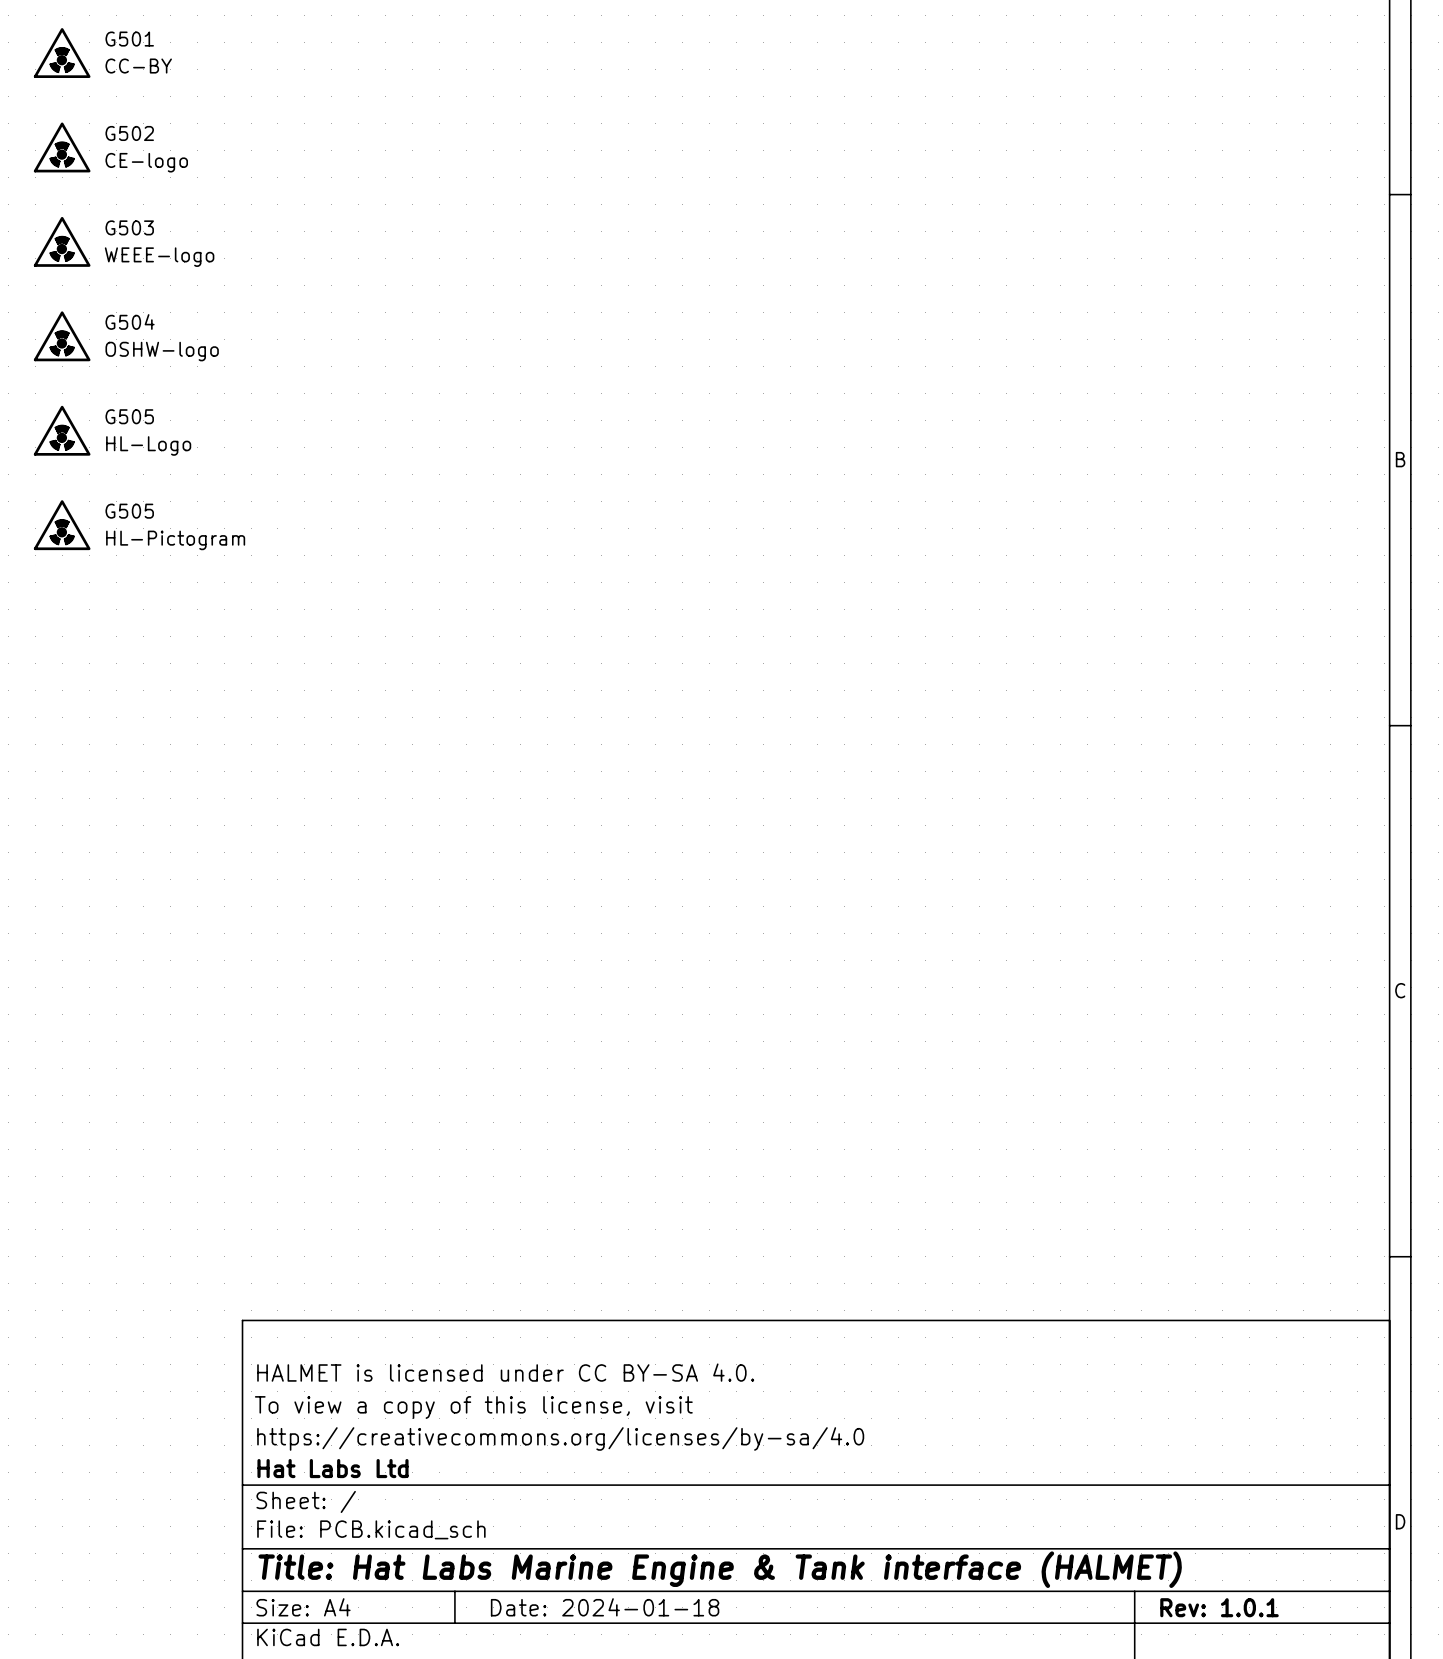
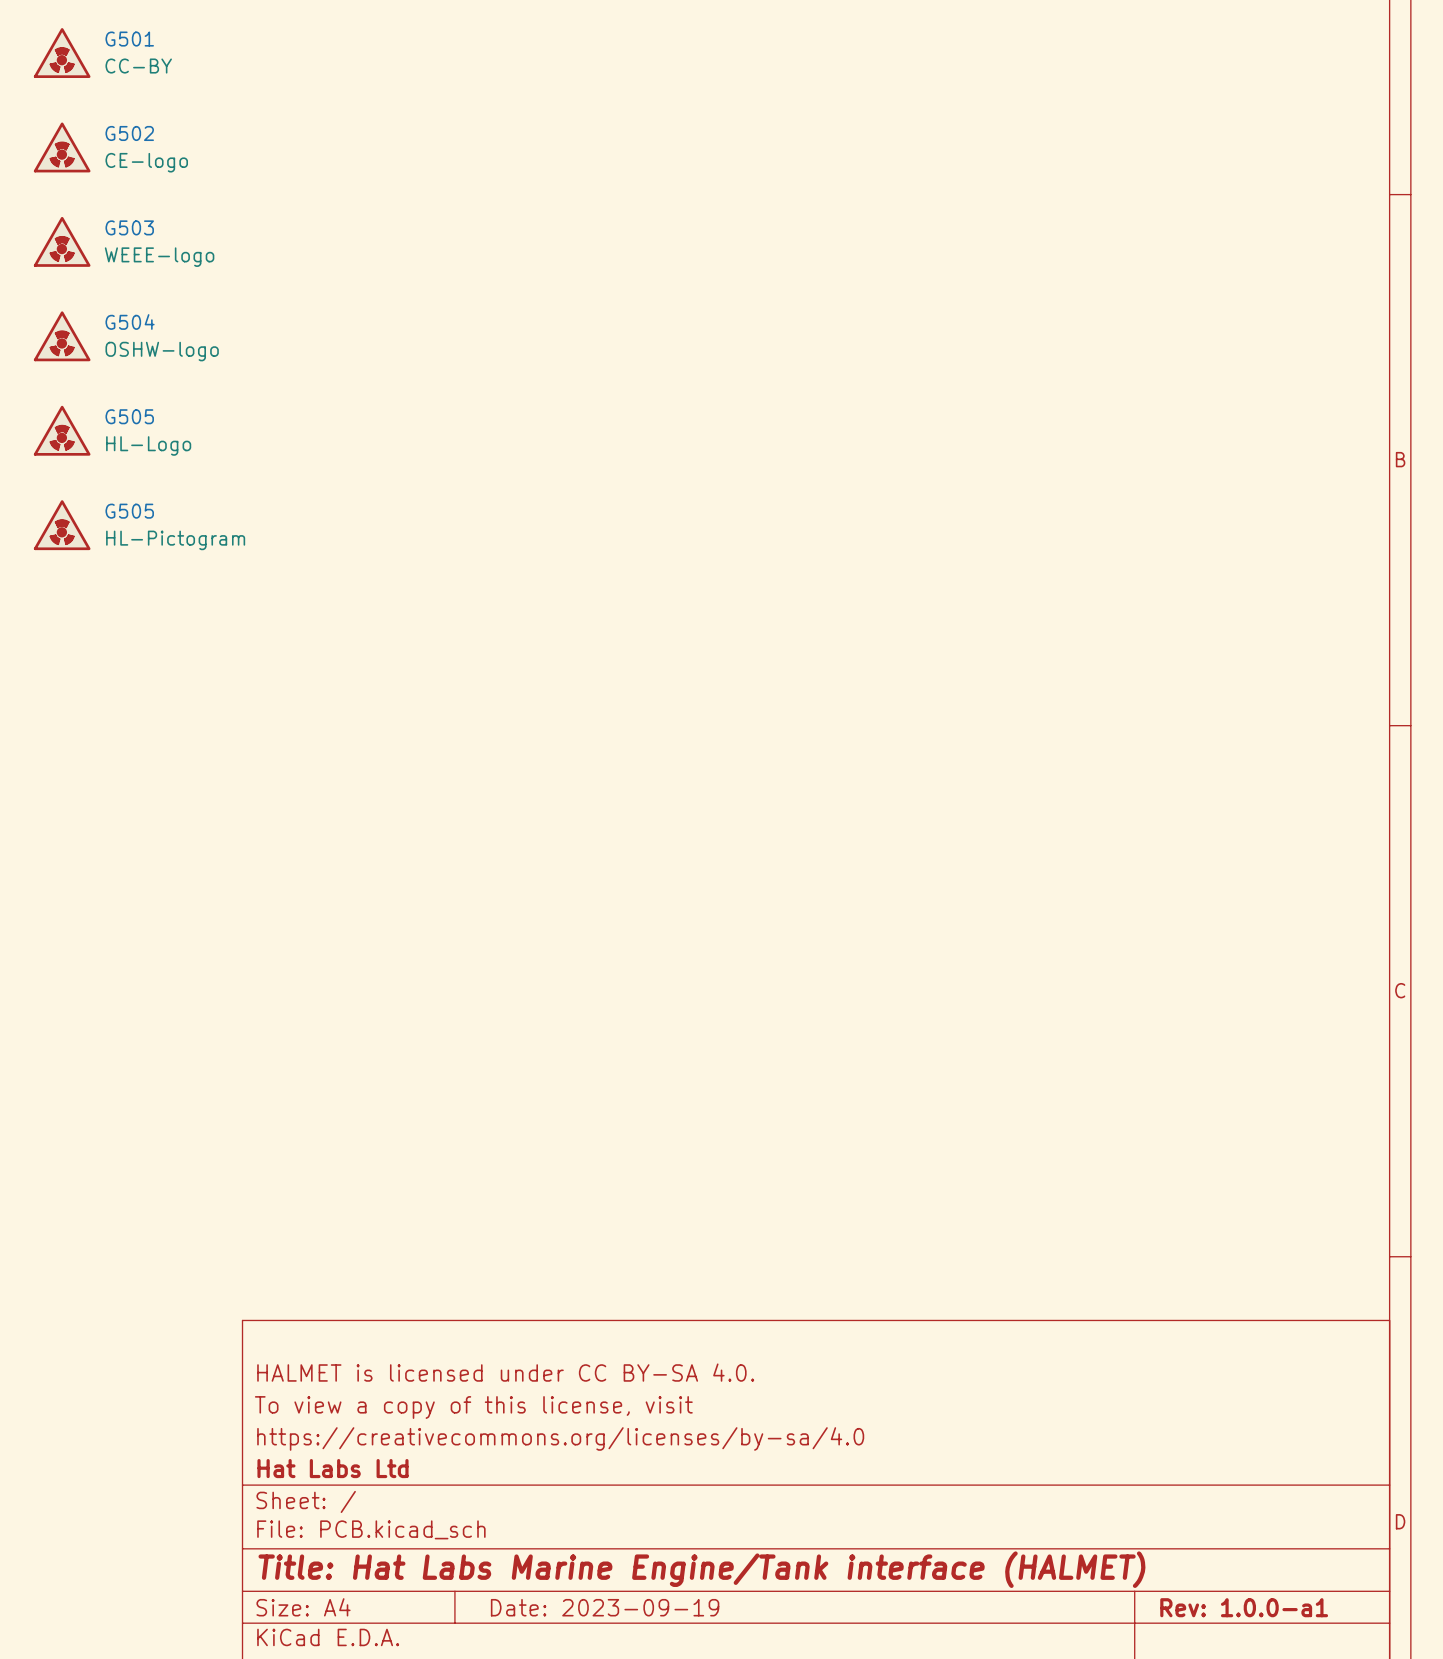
title block: Title: Hat Labs Marine Engine & Tank interface (HALMET) (720, 1569) -> Title: Hat Labs Marine Engine/Tank interface (HALMET) (701, 1569)
title block: Date: 2024-01-18 (605, 1607) -> Date: 2023-09-19 (605, 1607)
title block: Rev: 1.0.1 (1219, 1607) -> Rev: 1.0.0-a1 (1244, 1607)

